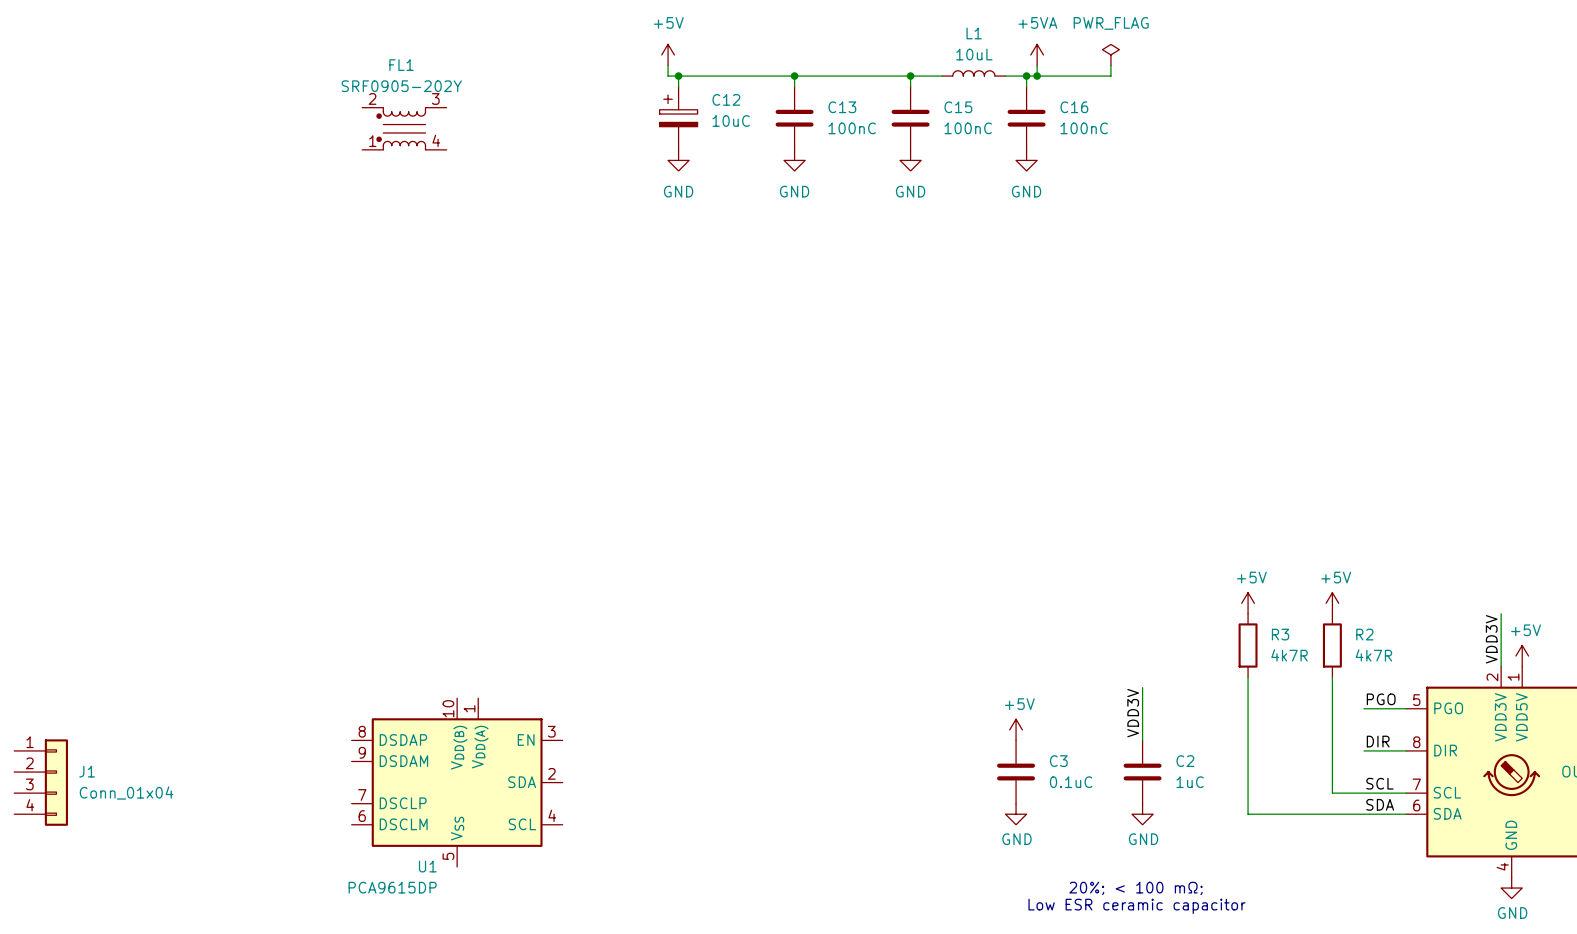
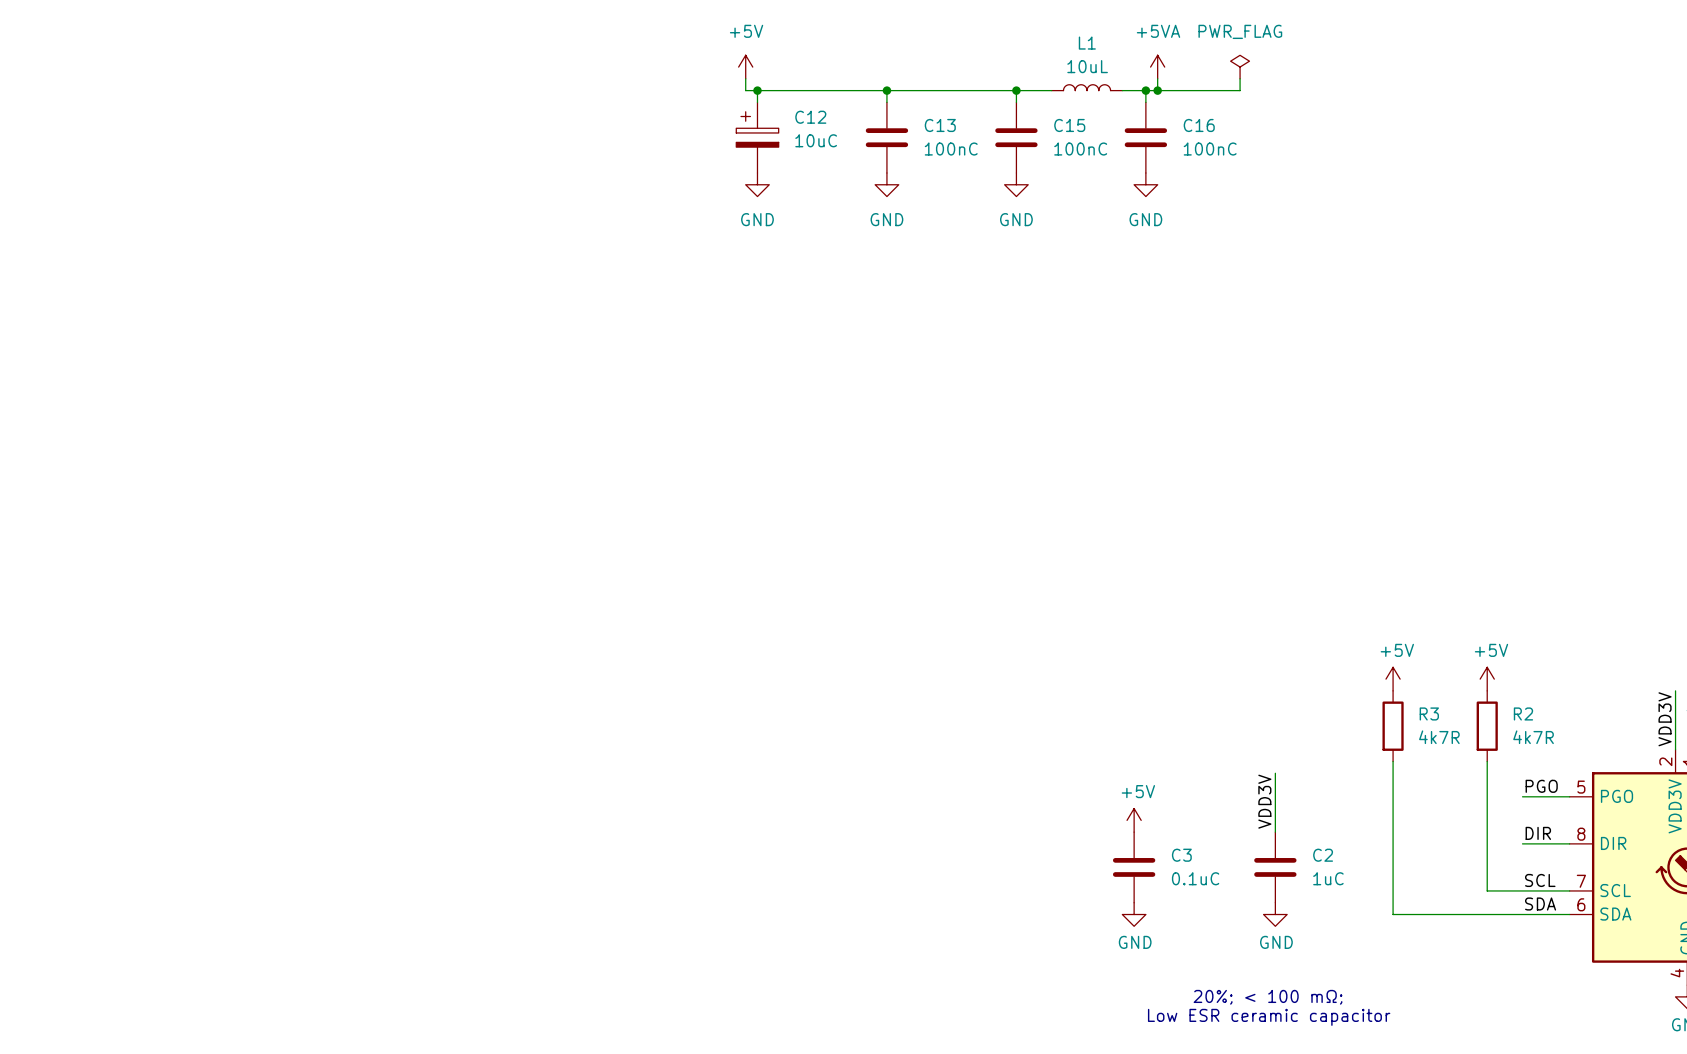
FL1: SRF0905-202Y (404, 128) -> none
J1: Conn_01x04 (41, 782) -> none
U1: PCA9615DP (457, 782) -> none

